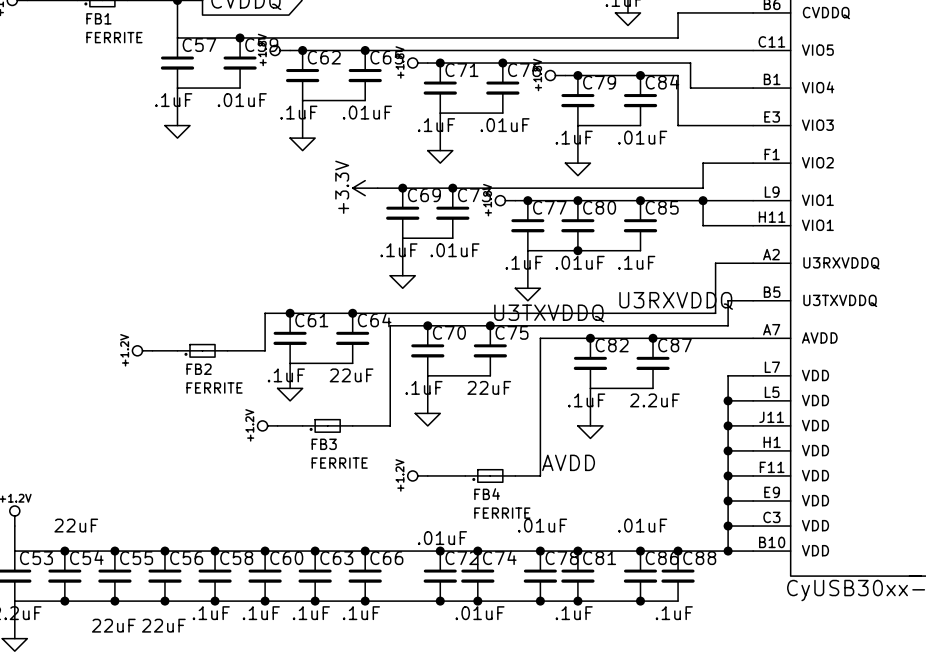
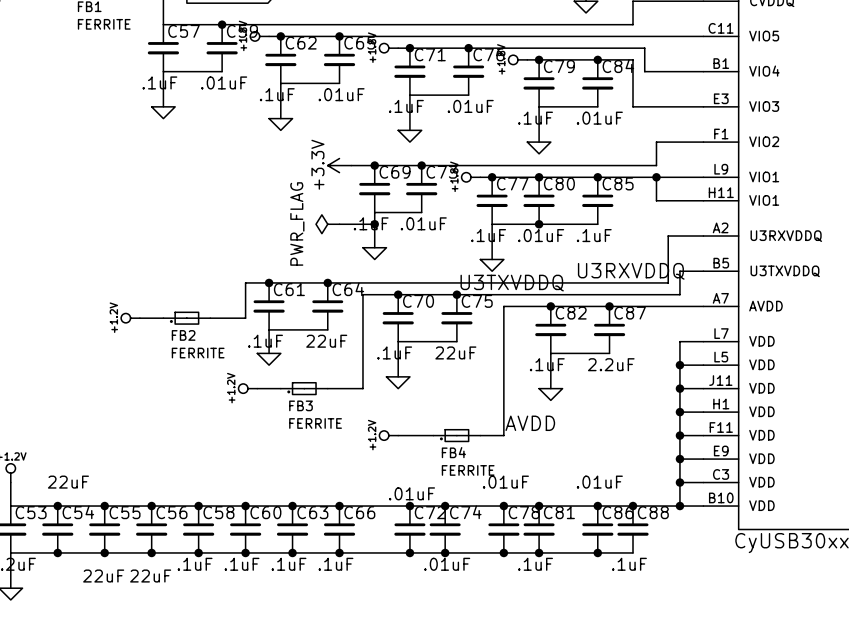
power symbol: none -> PWR_FLAG (327, 224)
wire: none -> (339, 224) (374, 224)
junction: none -> (374, 224)

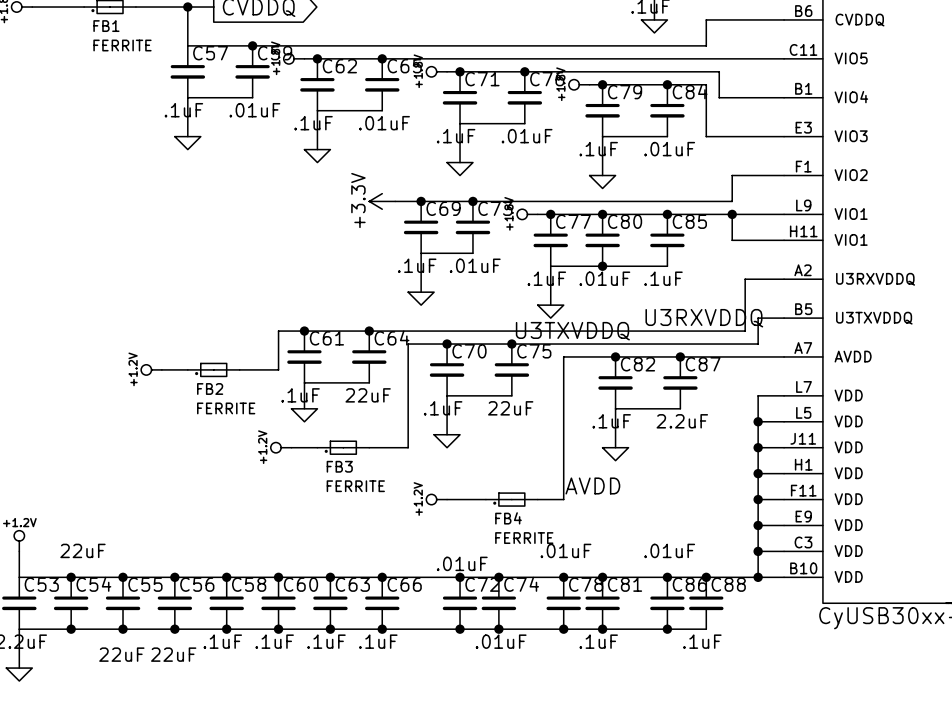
power symbol: PWR_FLAG (327, 224) -> none
wire: (339, 224) (374, 224) -> none
junction: (374, 224) -> none

